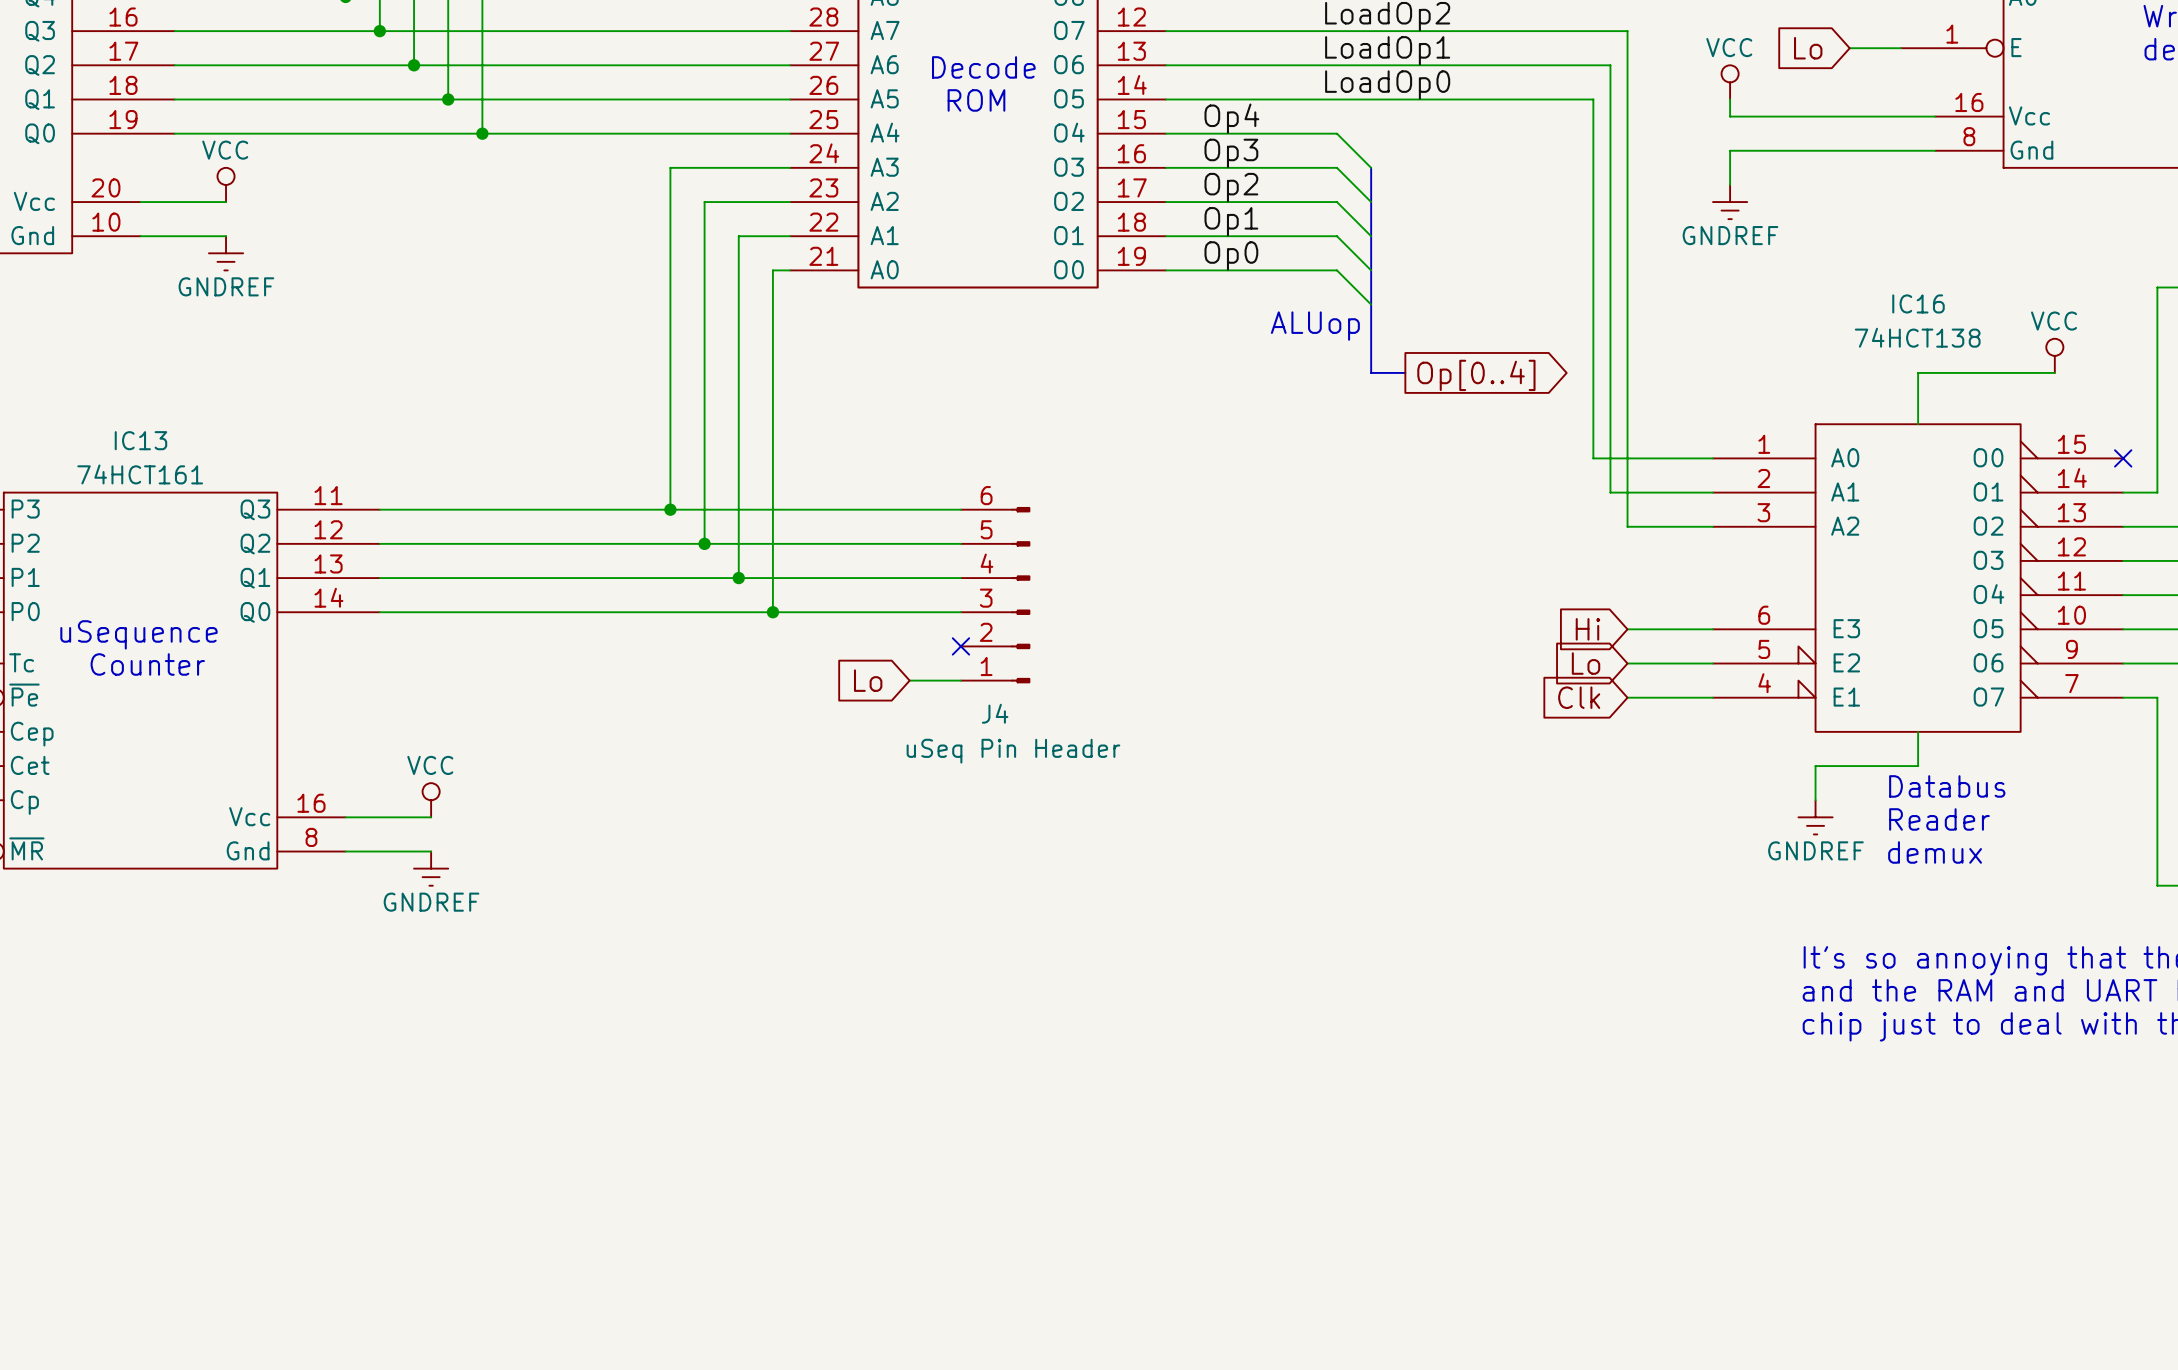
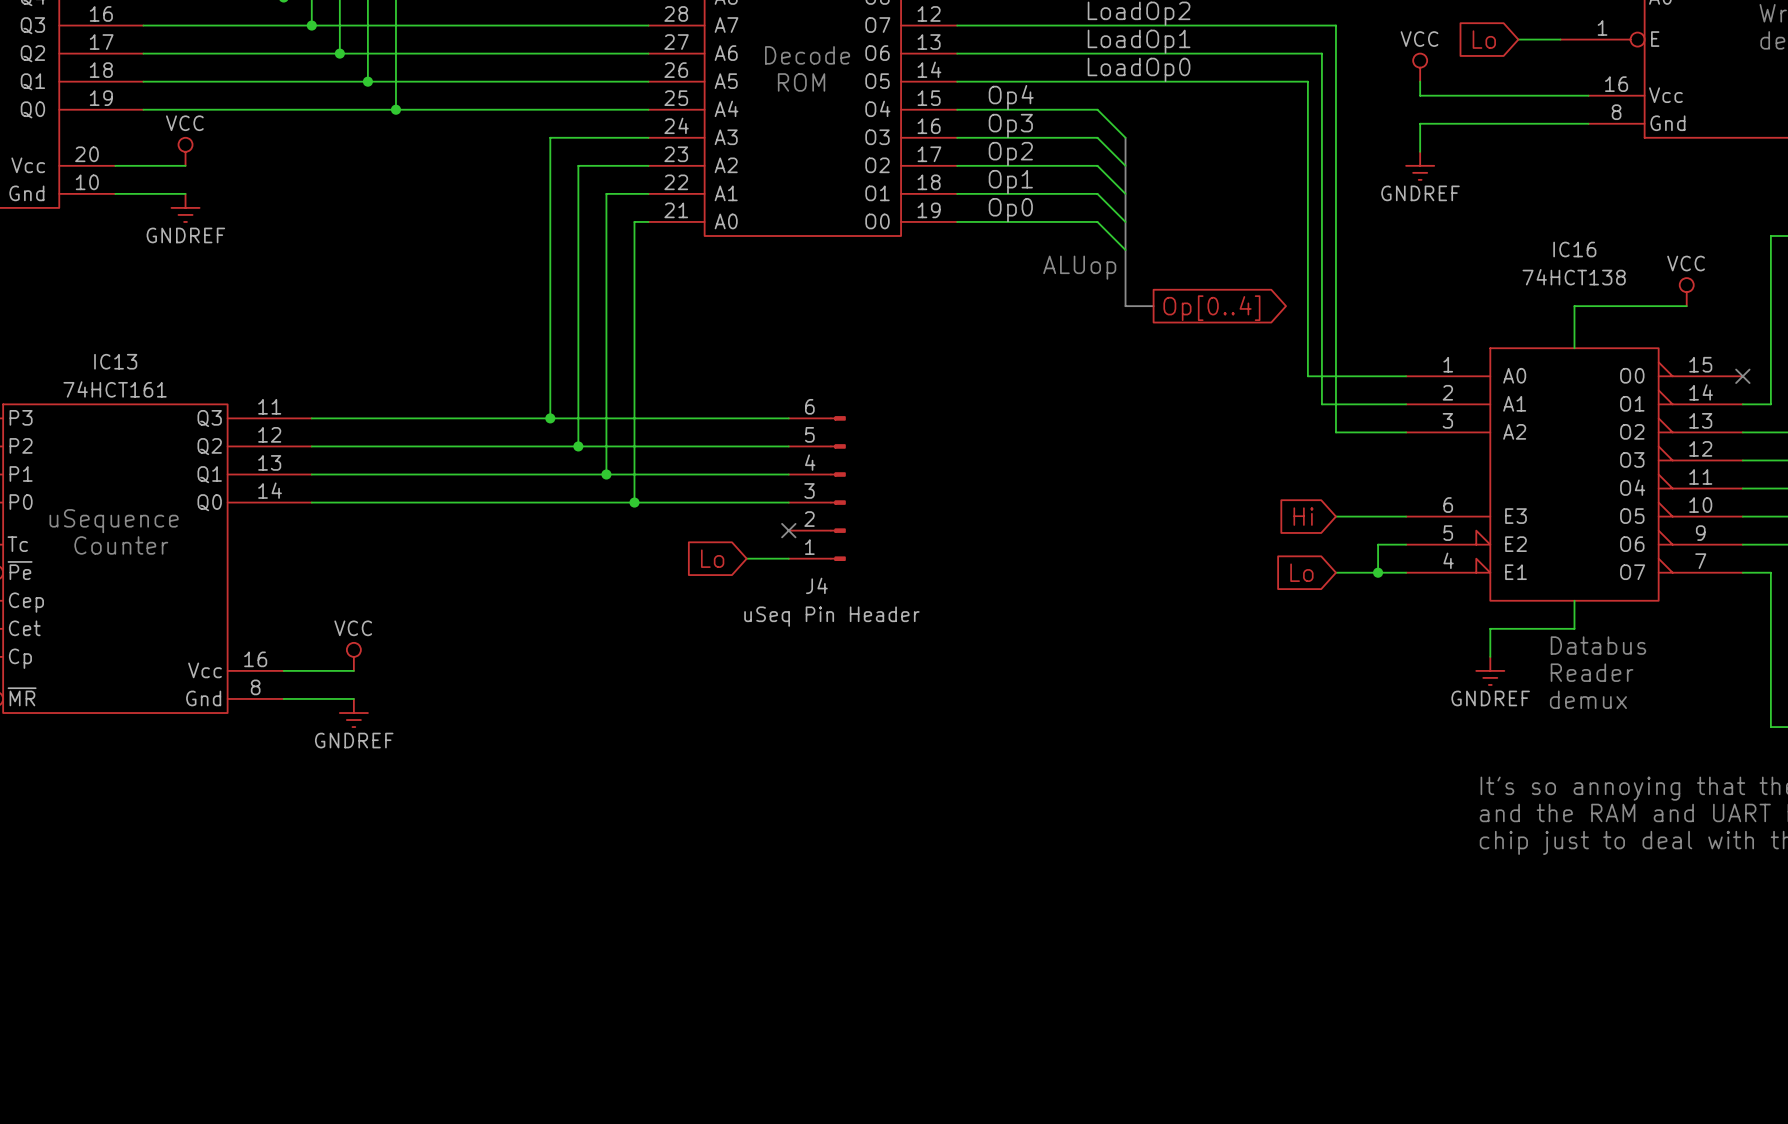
global label: Lo (1586, 663) -> none
wire: (1627, 663) (1678, 663) -> (1378, 572) (1378, 544)
global label: Clk (1579, 697) -> Lo (1301, 572)
junction: none -> (1378, 572)

